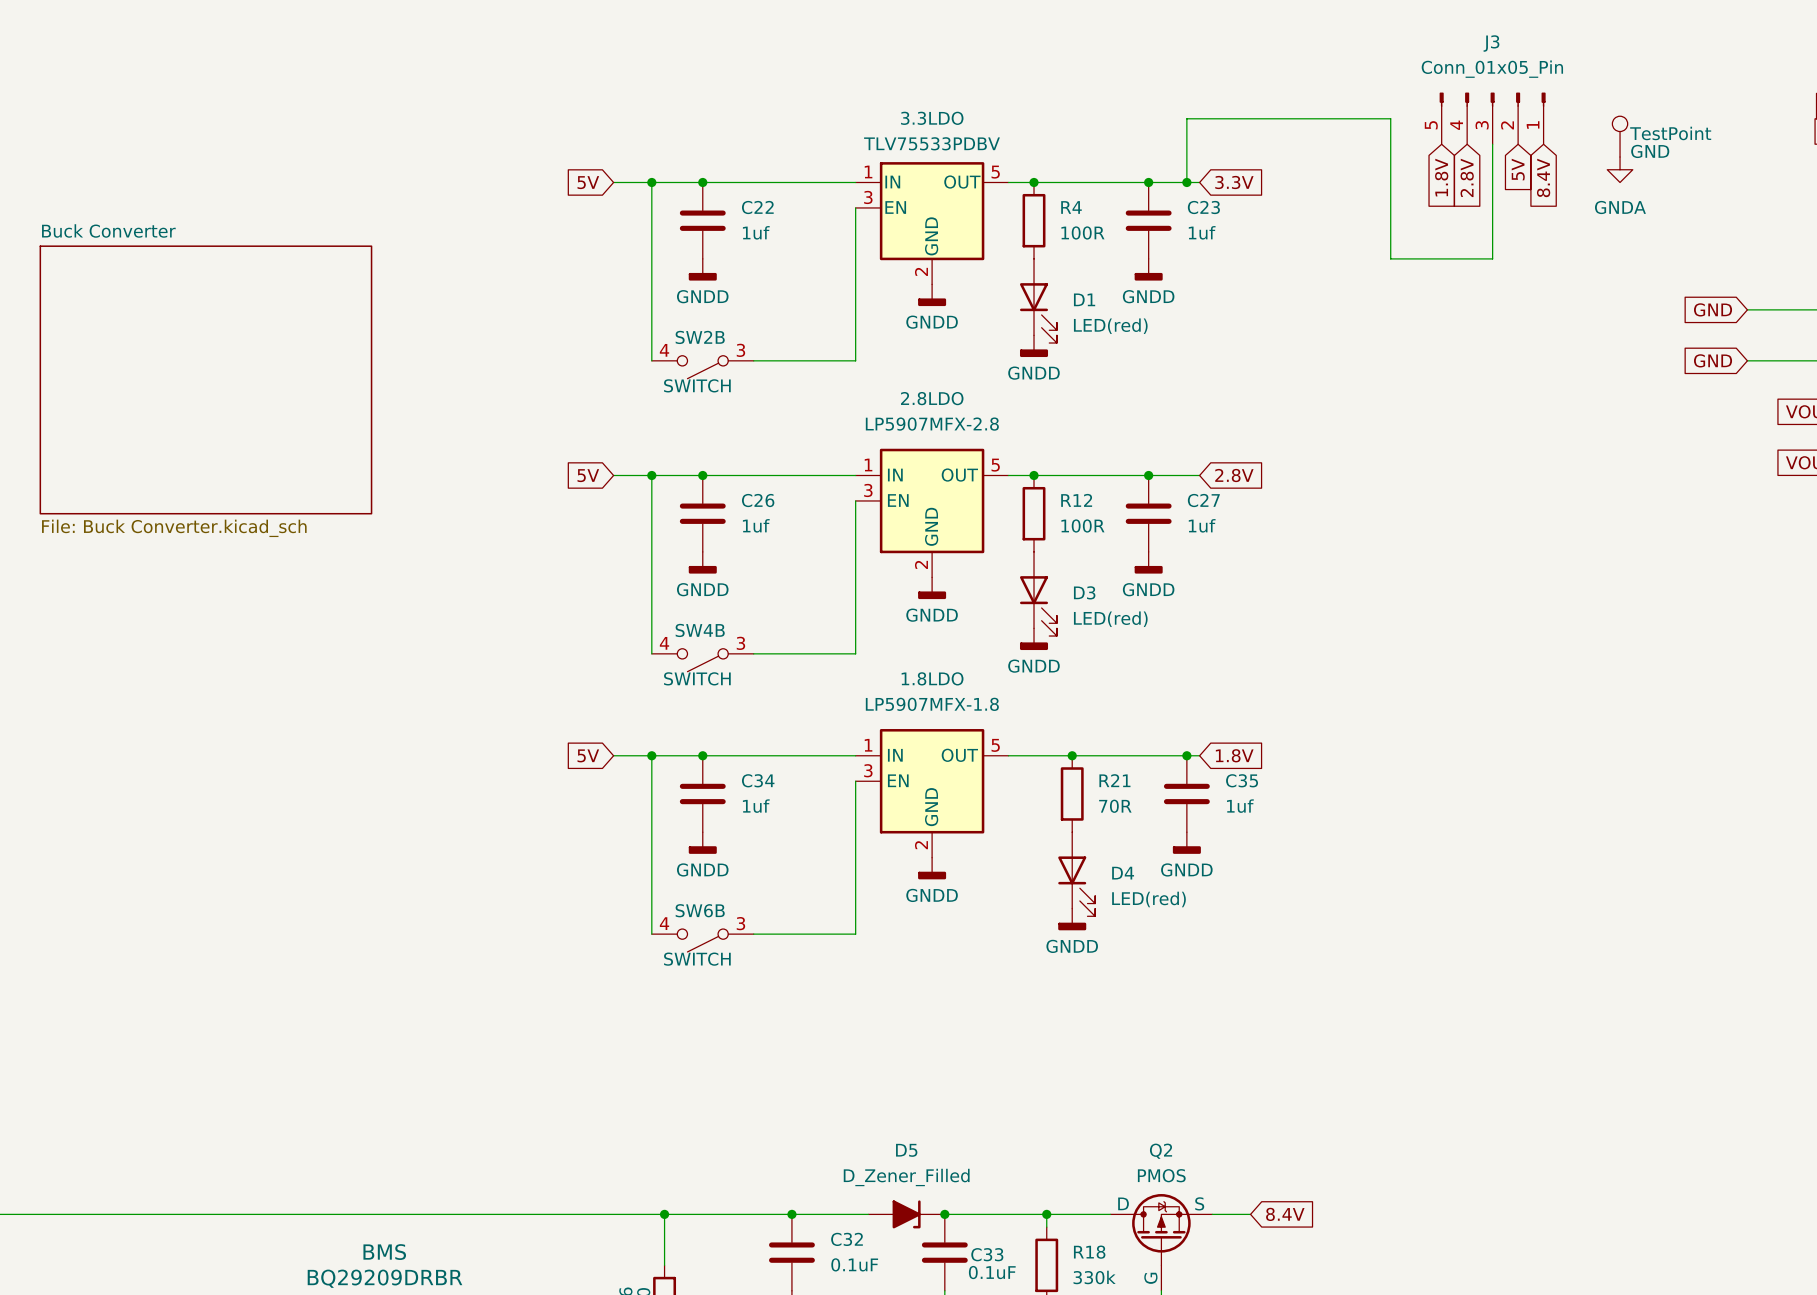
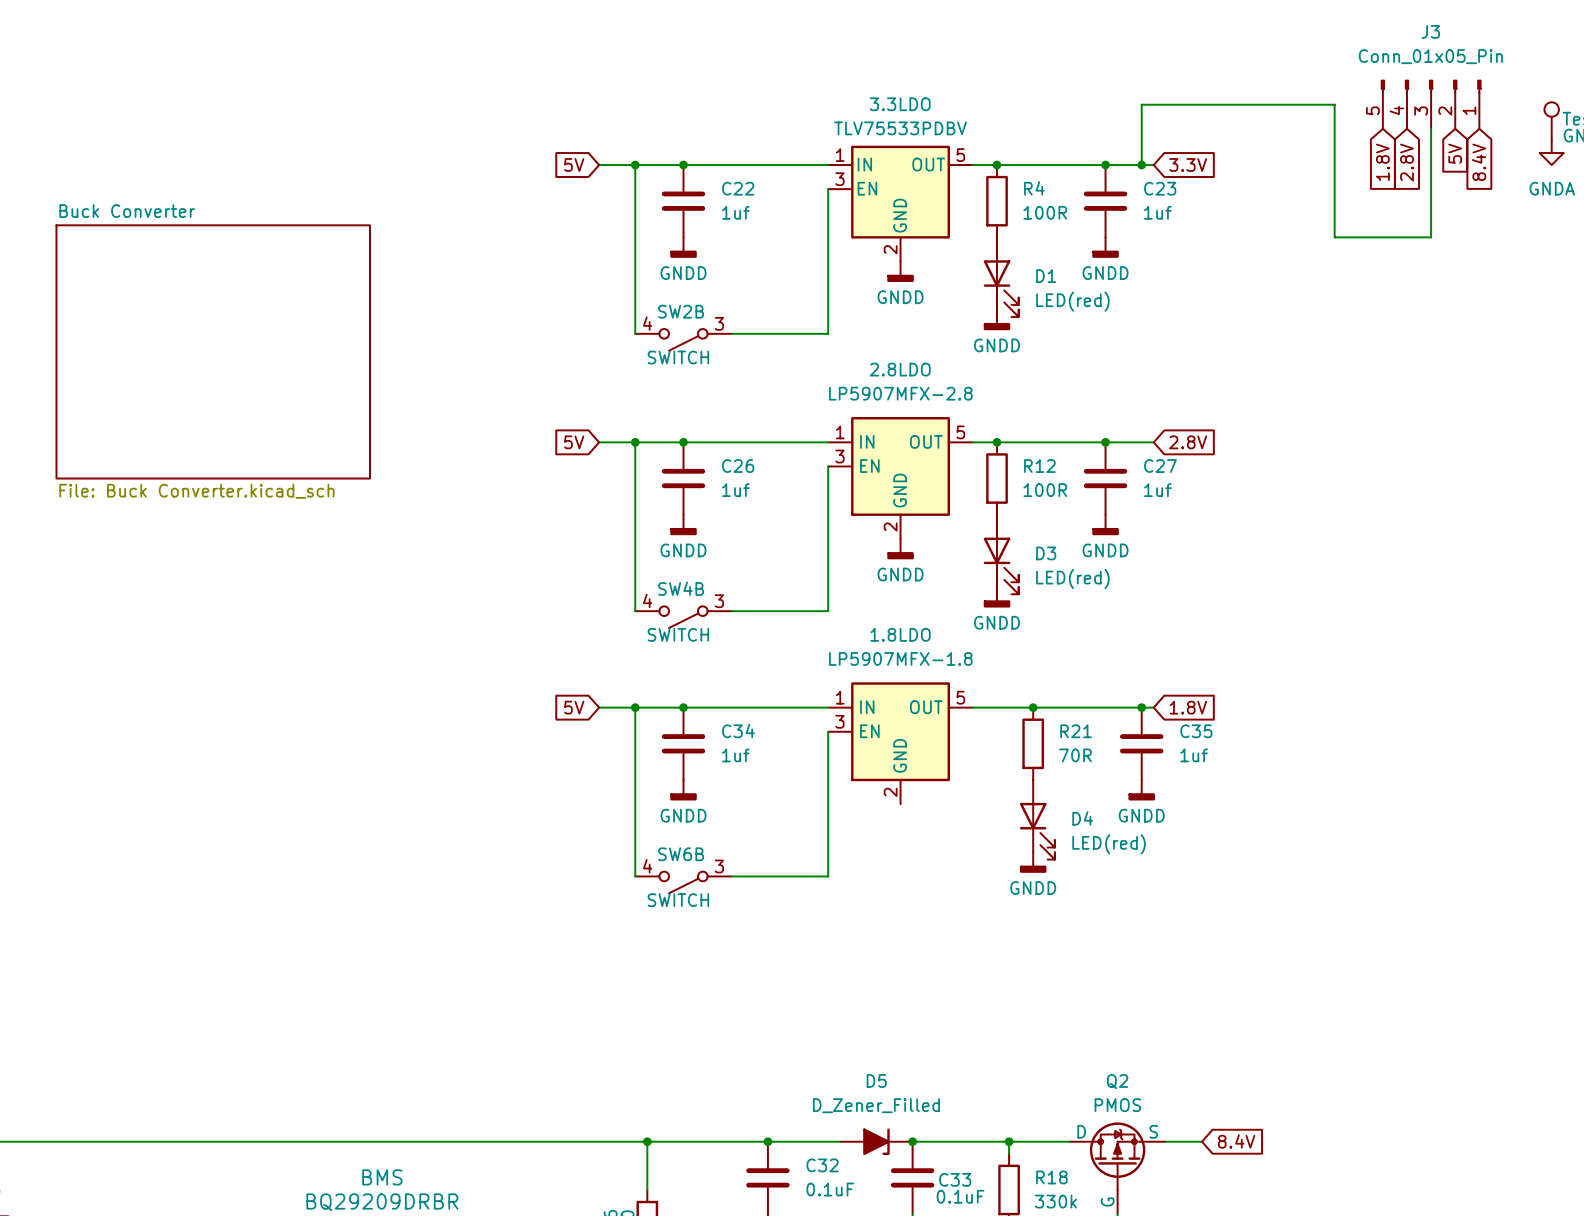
power symbol: GNDD (932, 868) -> none

